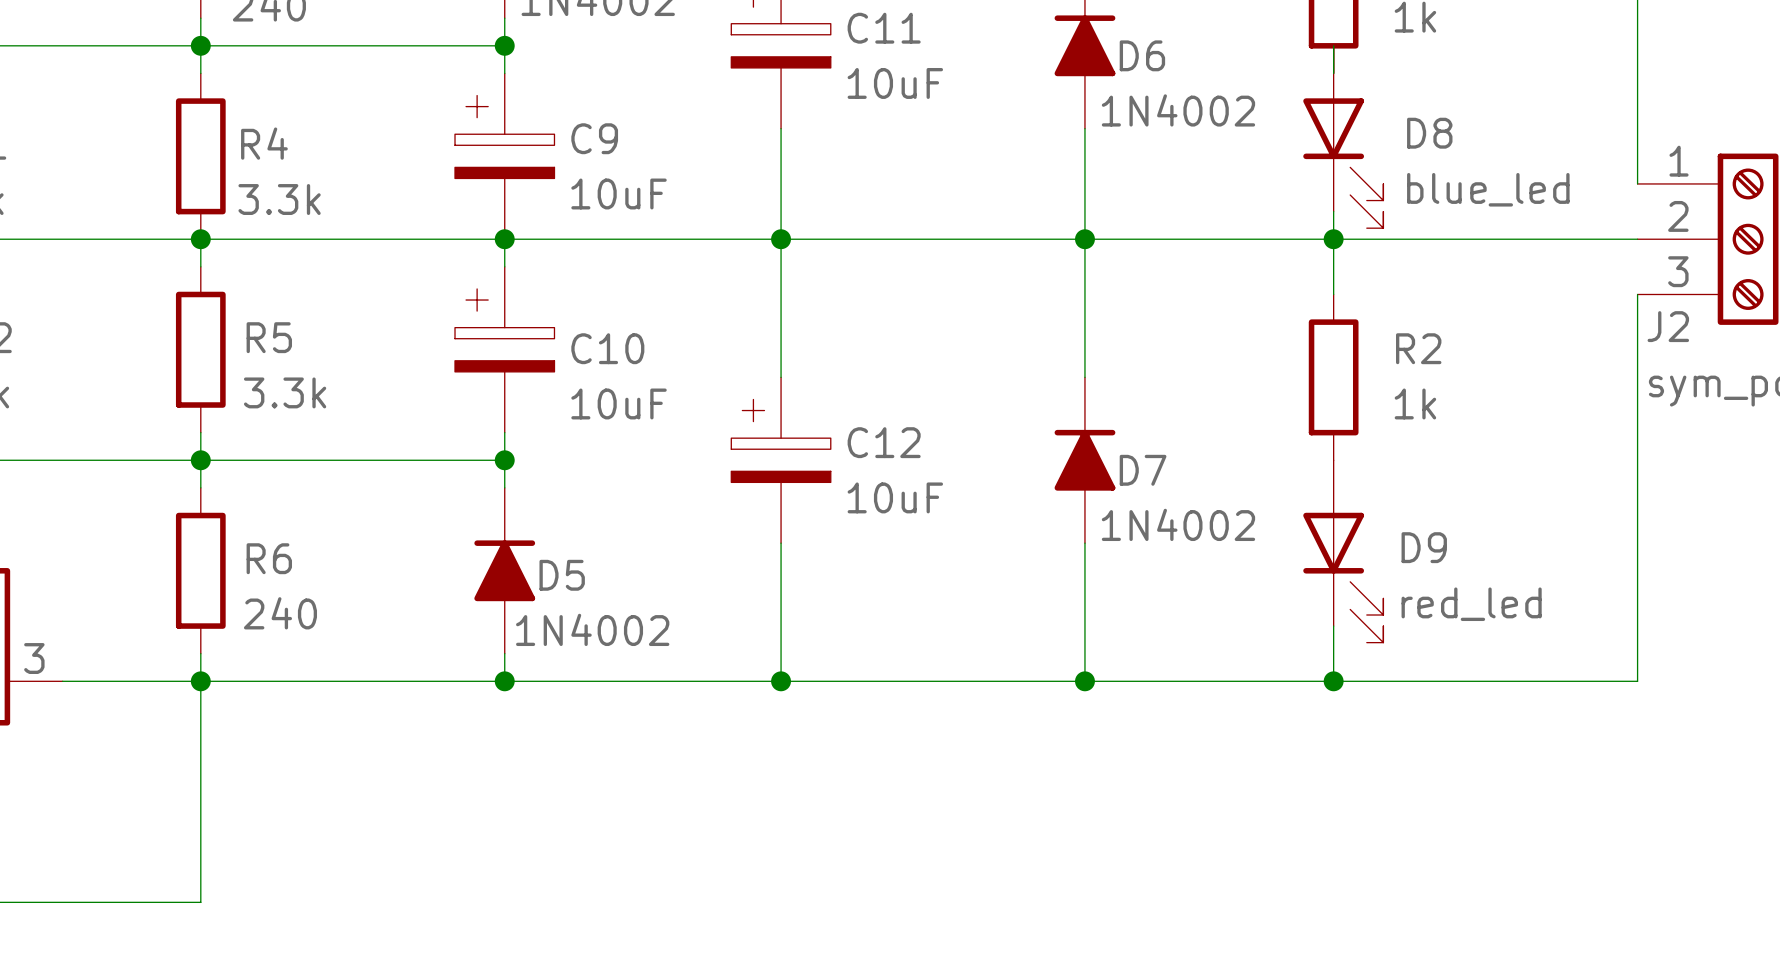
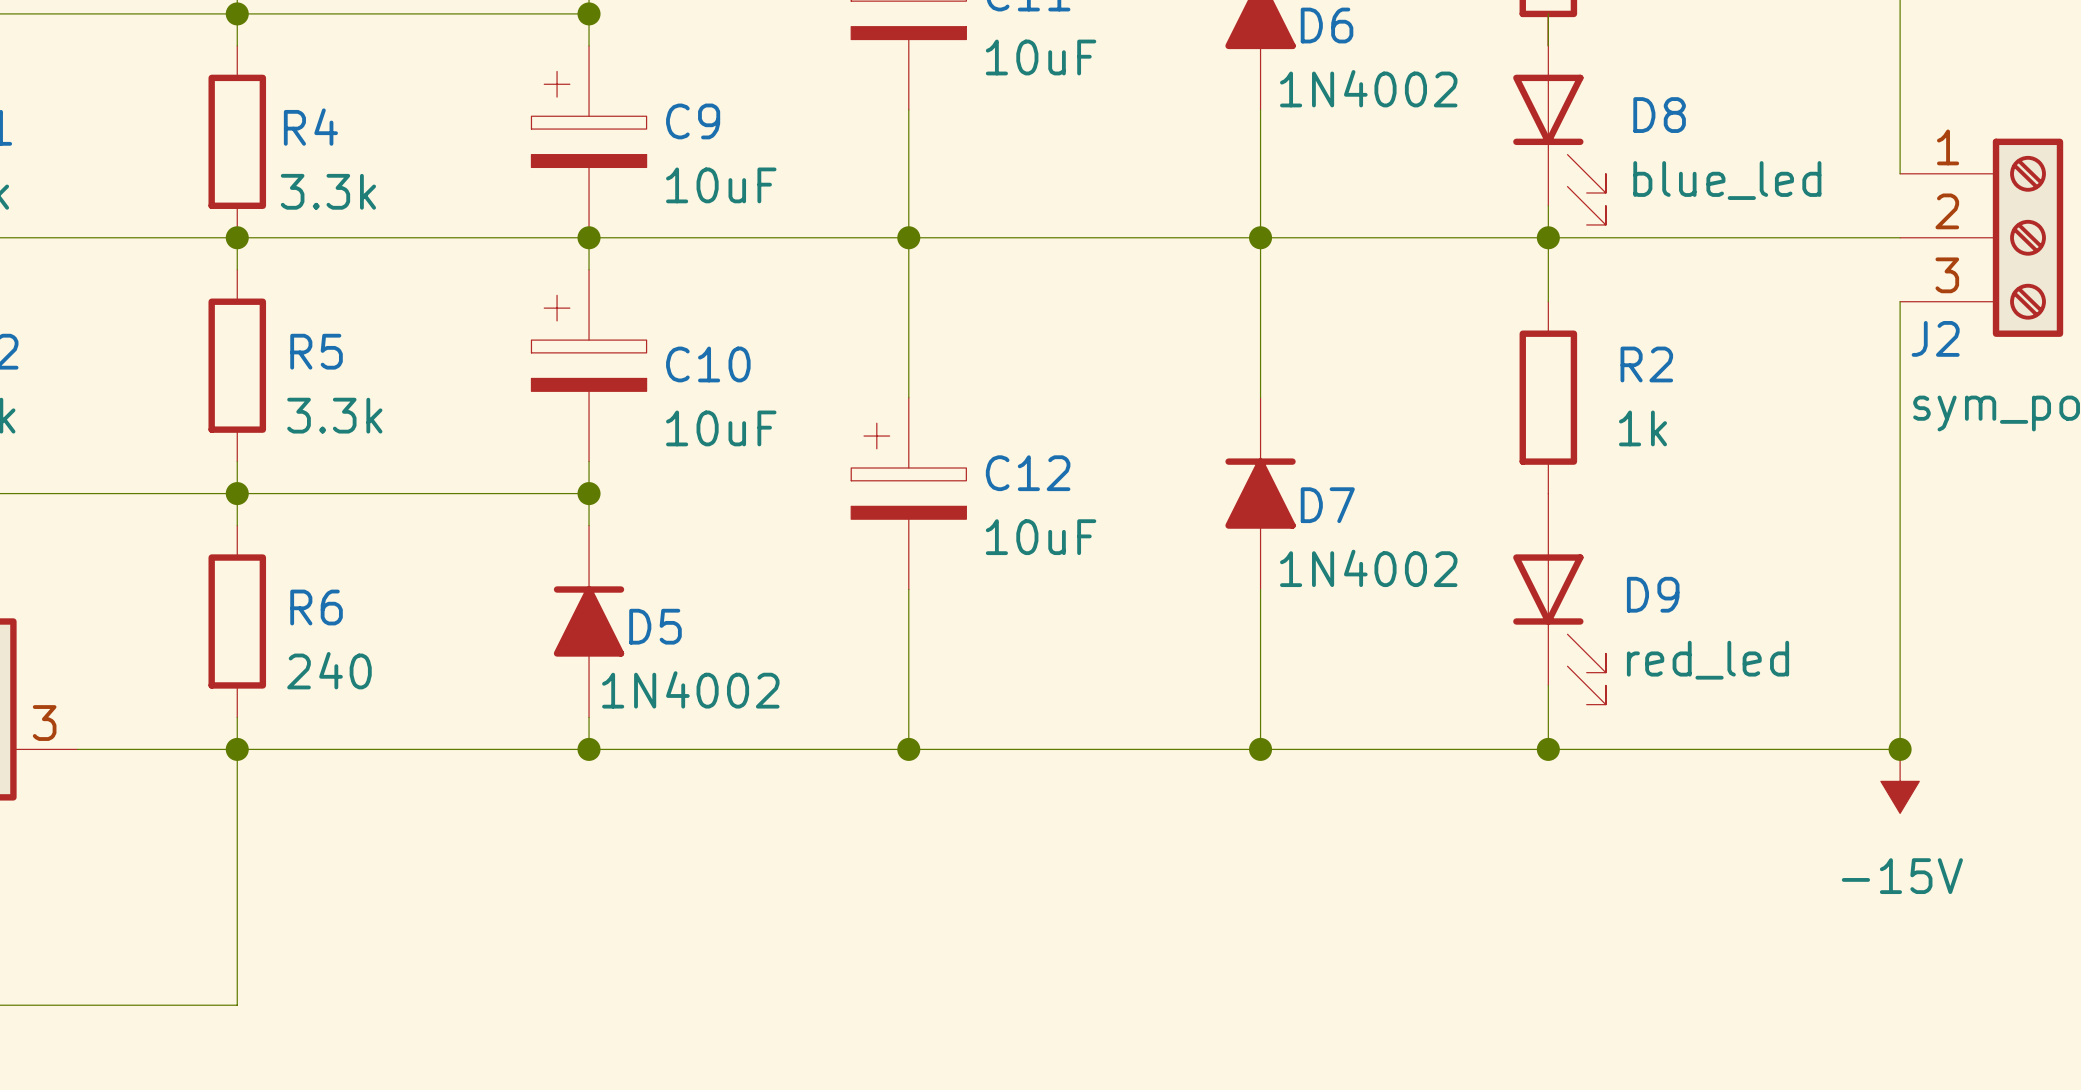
junction: none -> (1900, 749)
power symbol: none -> -15V (1900, 781)

